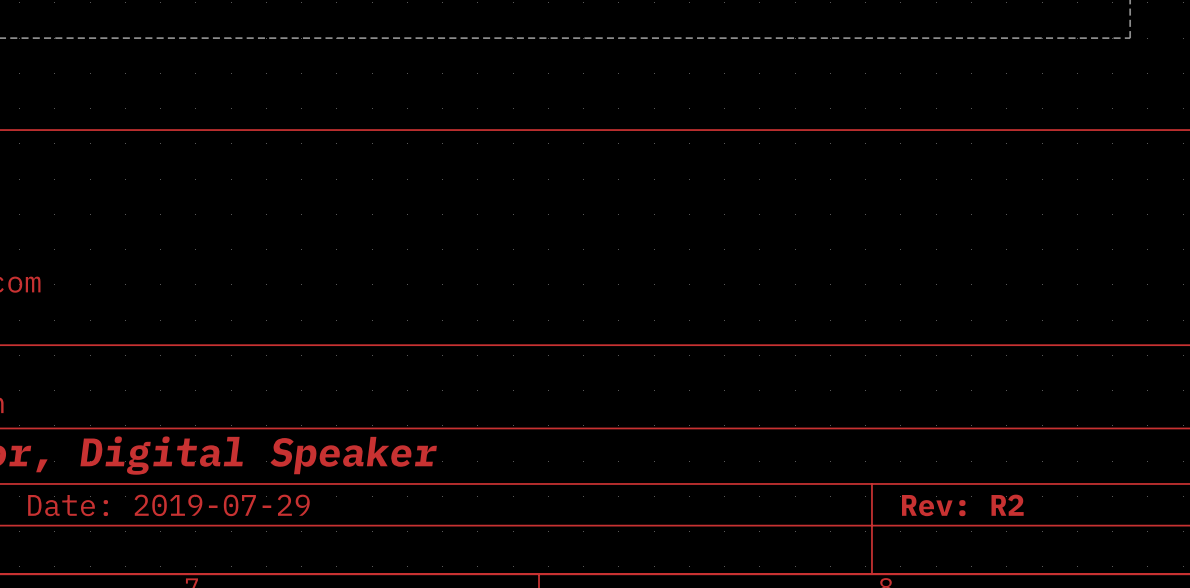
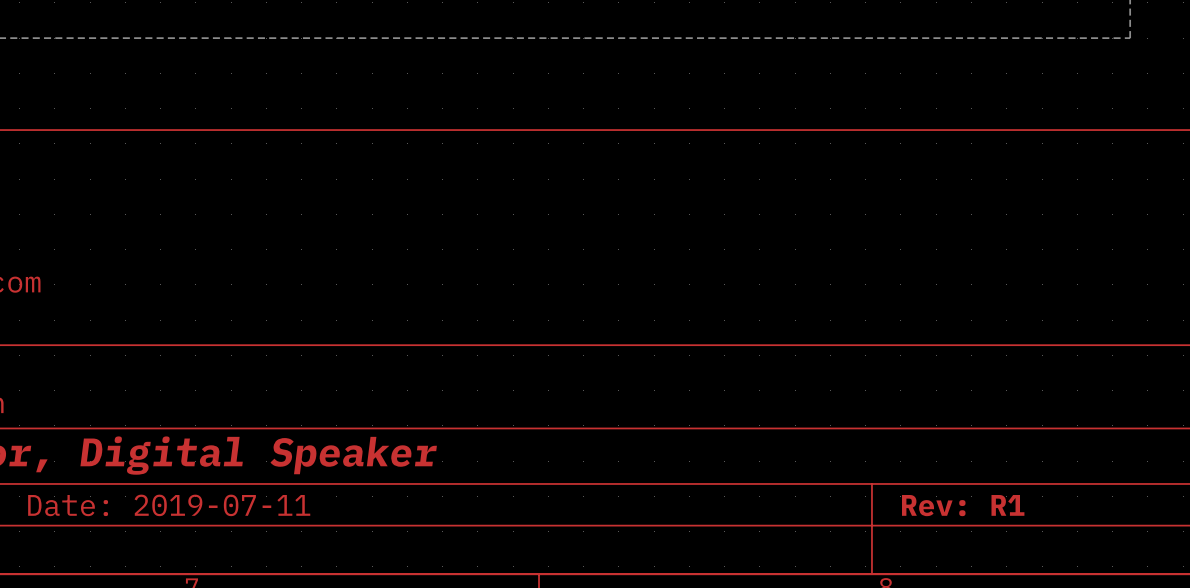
title block: Date: 2019-07-29 (168, 505) -> Date: 2019-07-11 (169, 505)
title block: Rev: R2 (962, 505) -> Rev: R1 (963, 505)

